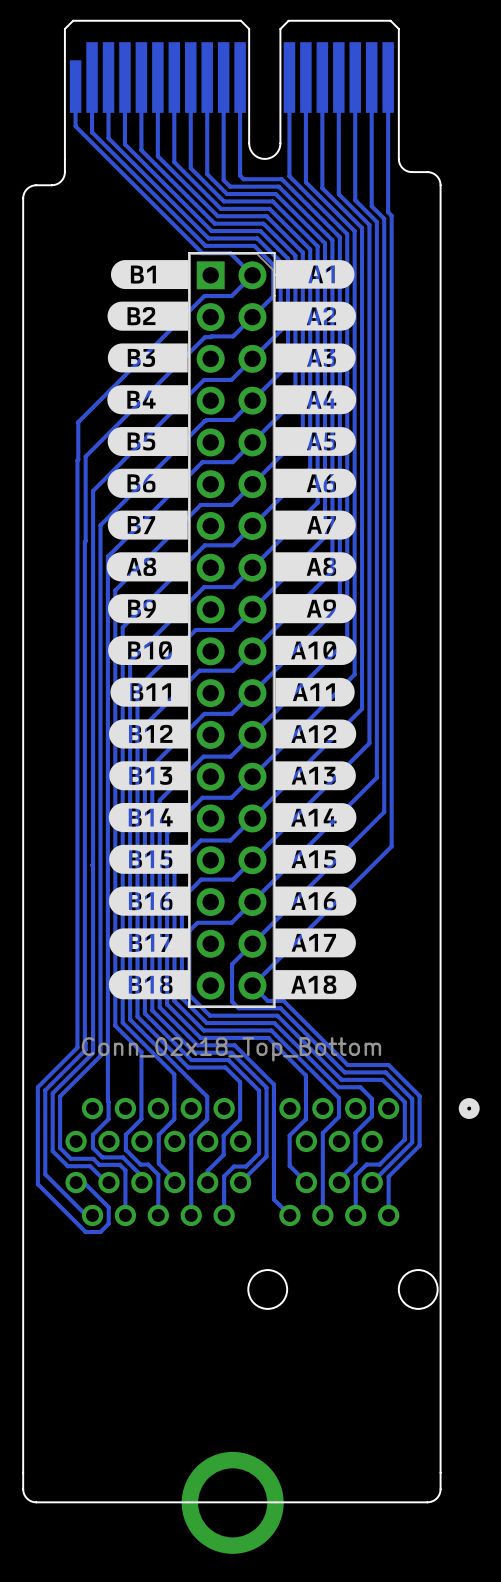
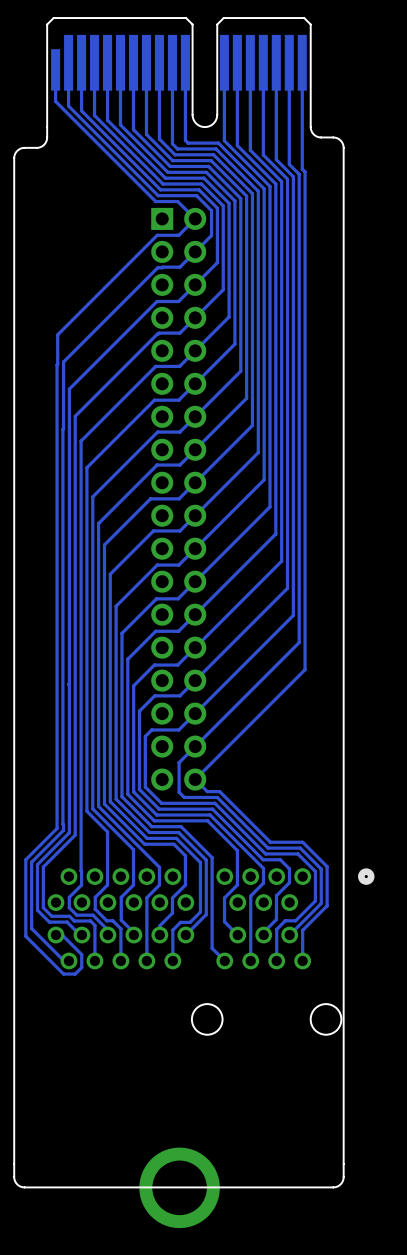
drawing: [106, 252, 357, 1009] -> none

